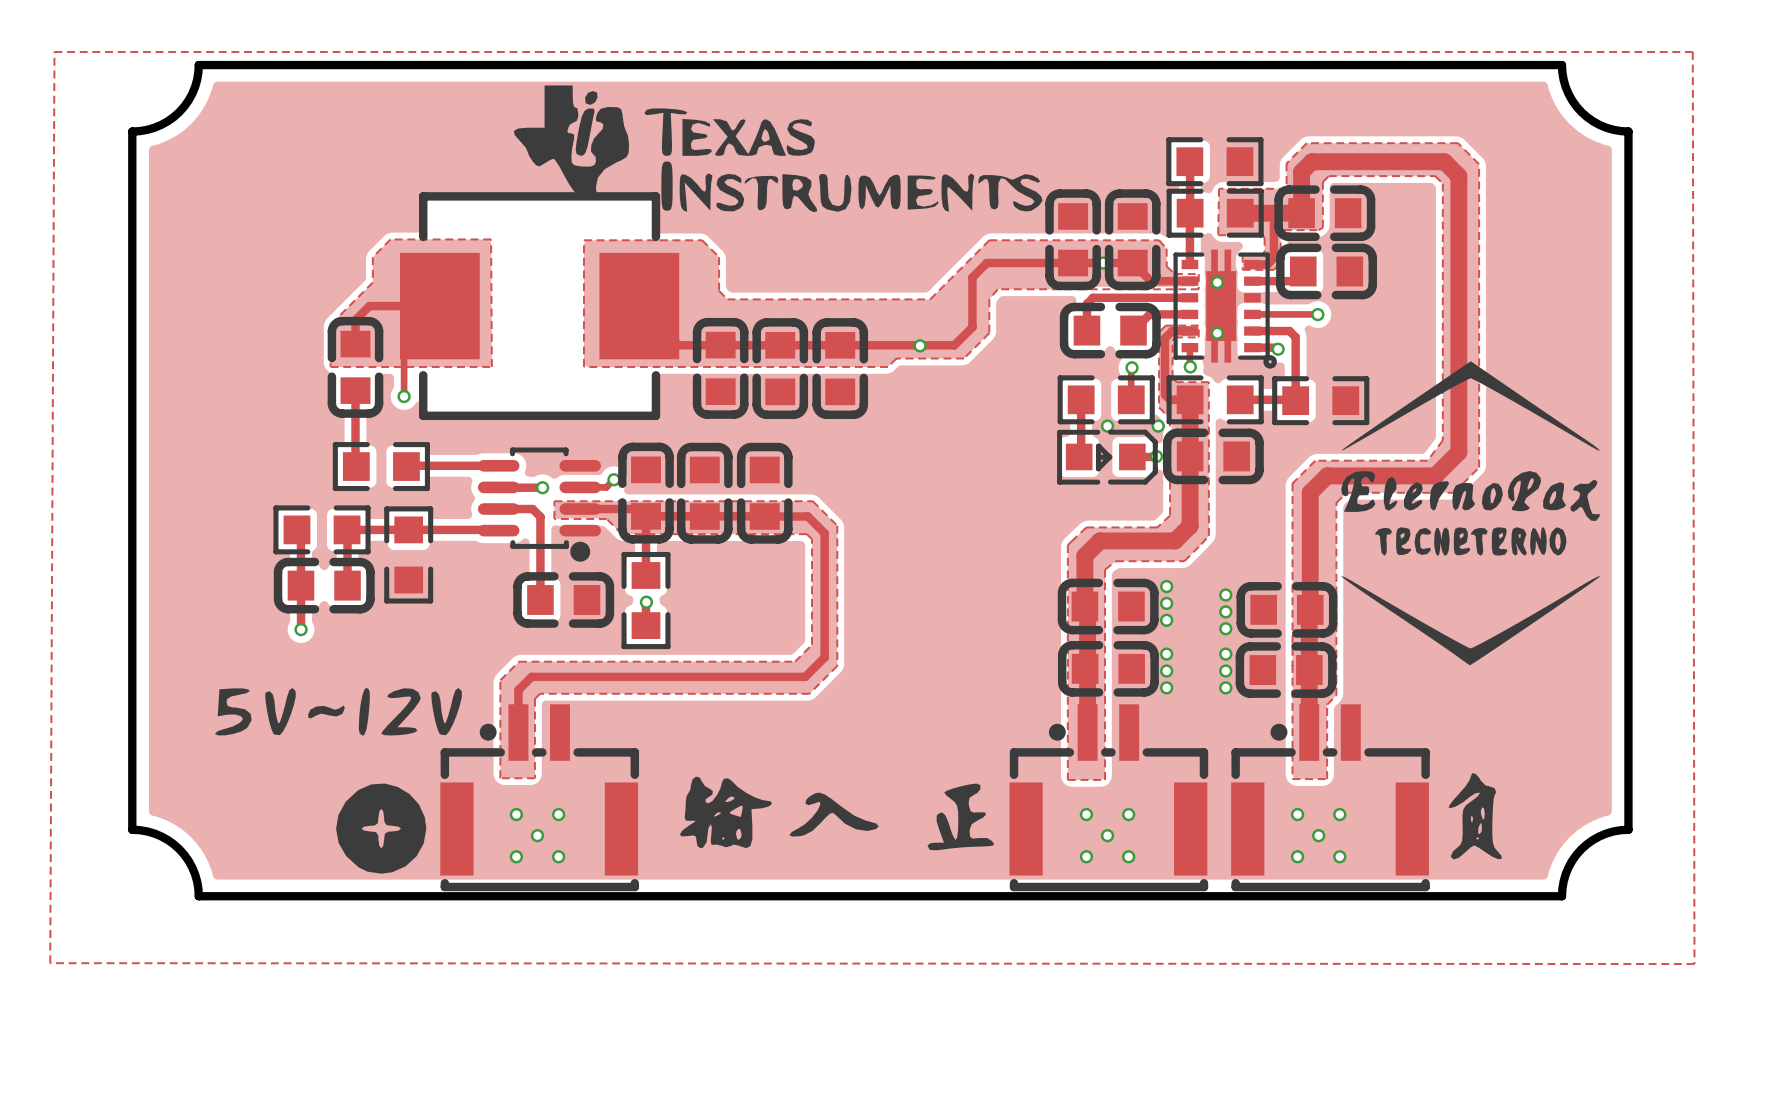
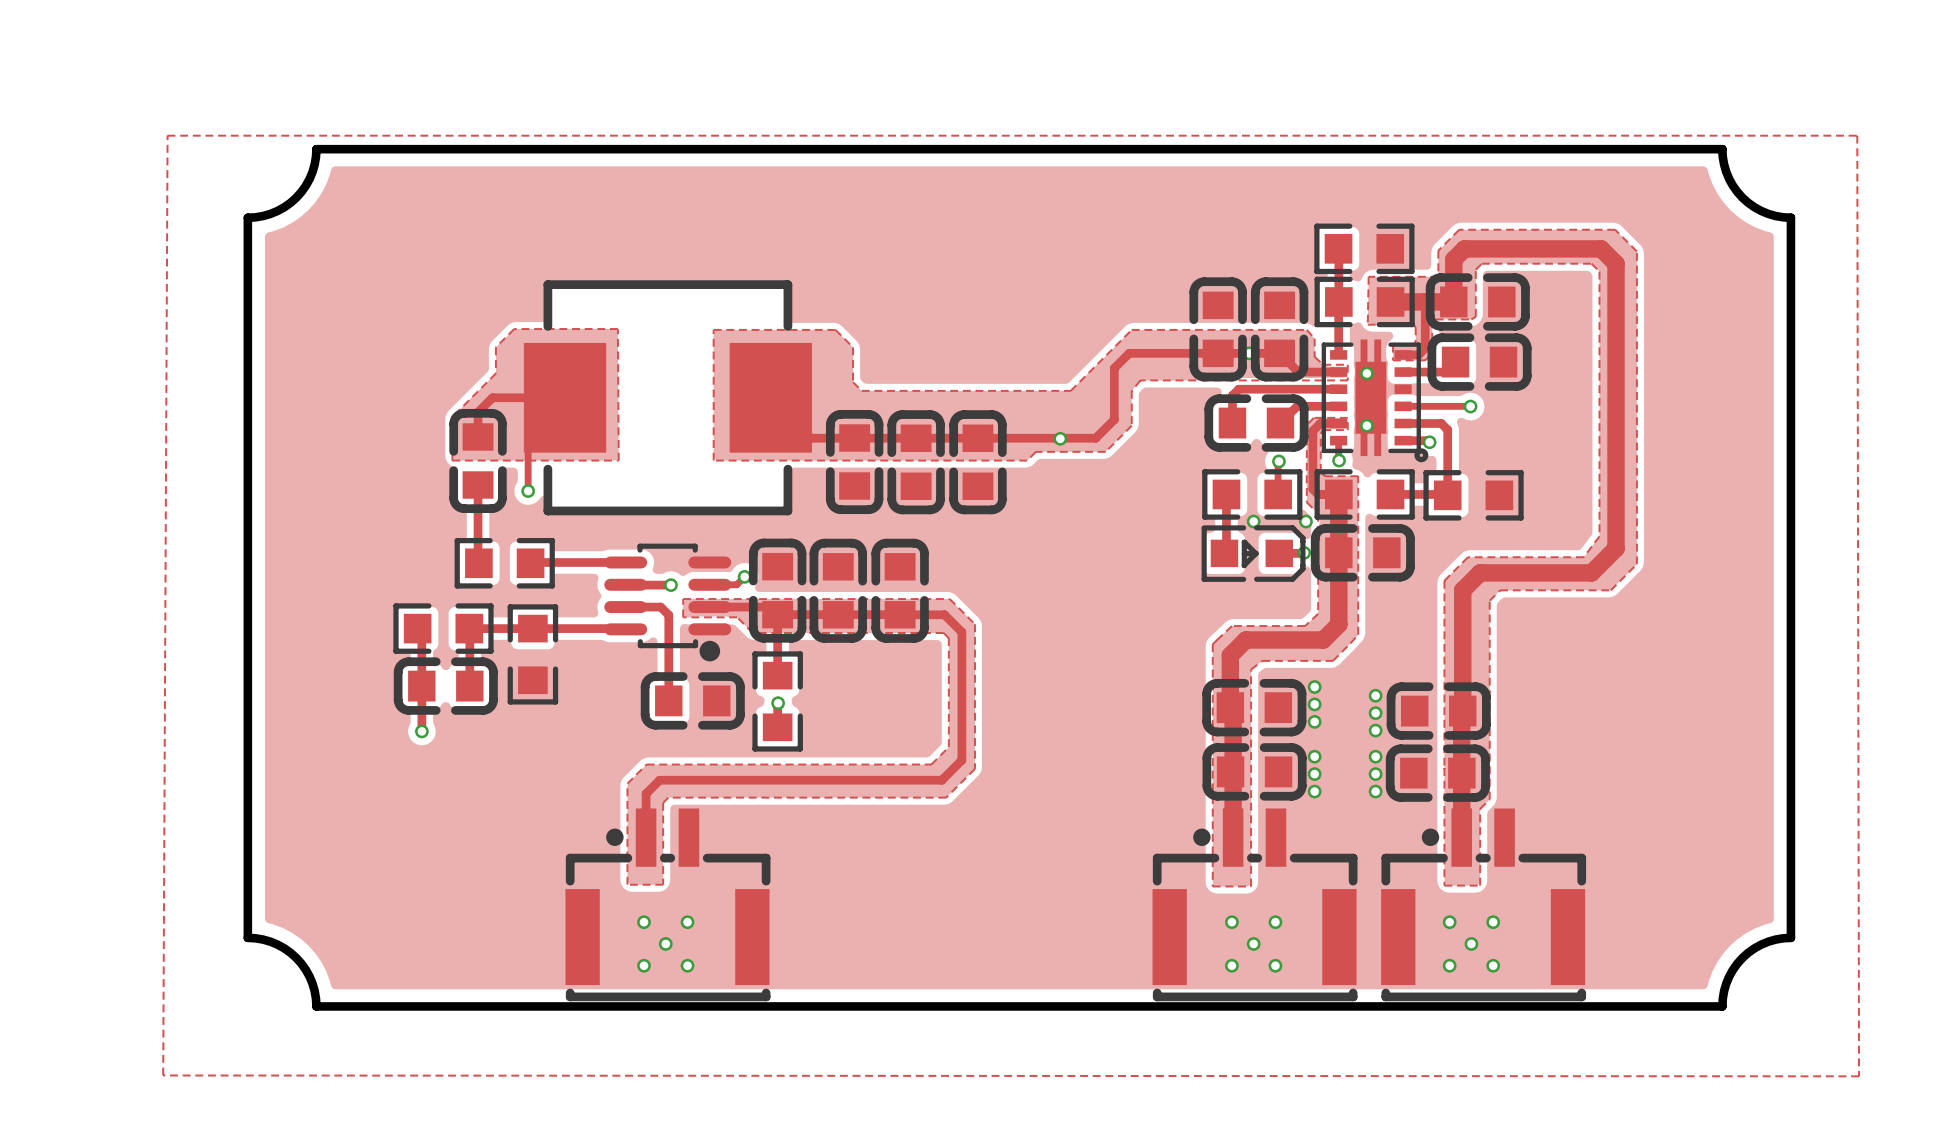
drawing: [215, 85, 1601, 874] -> none

